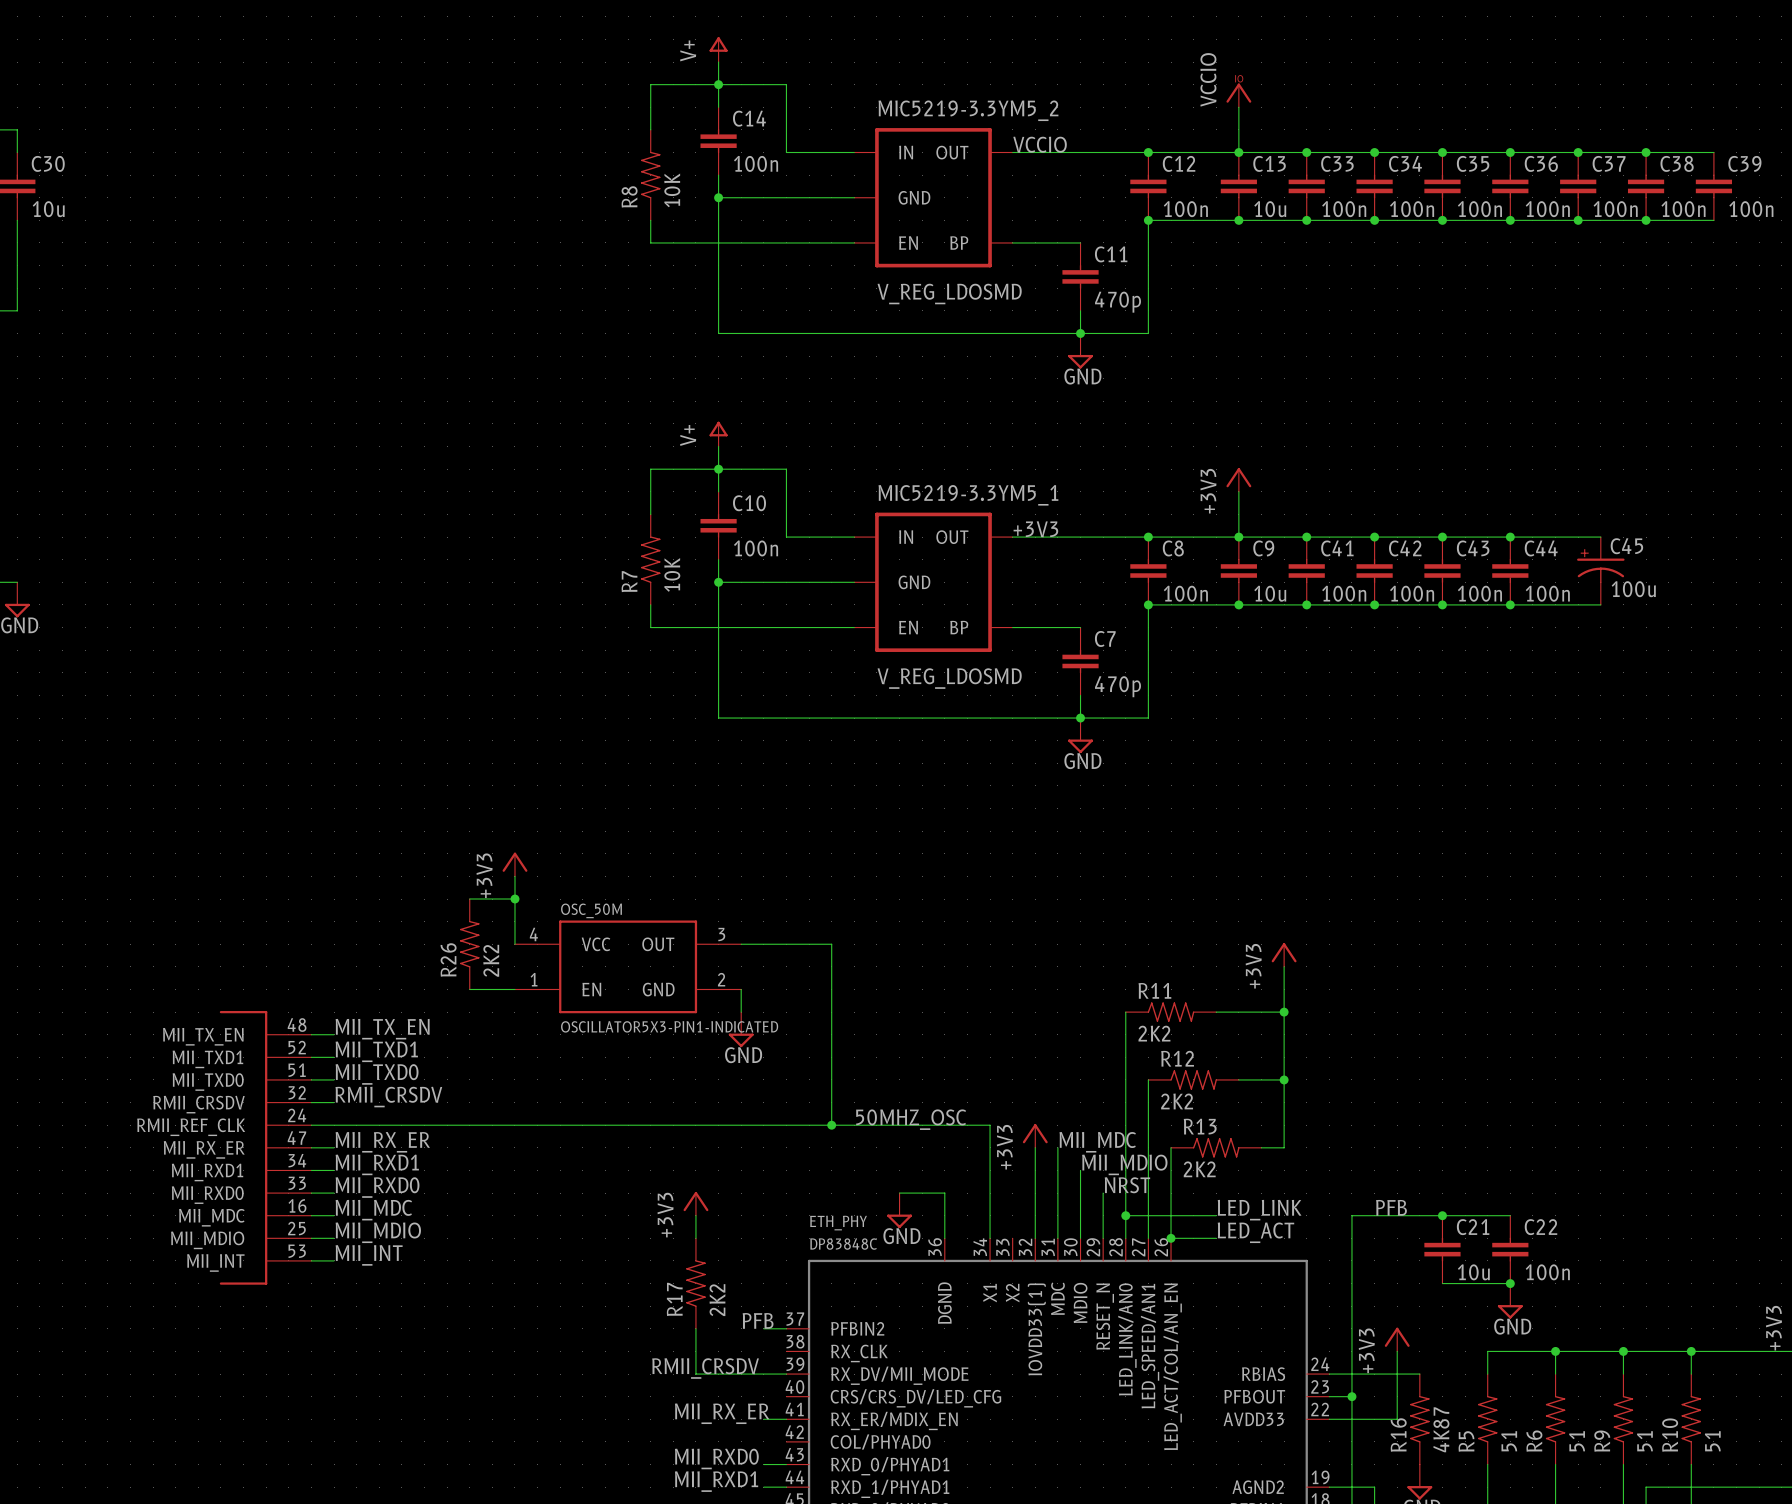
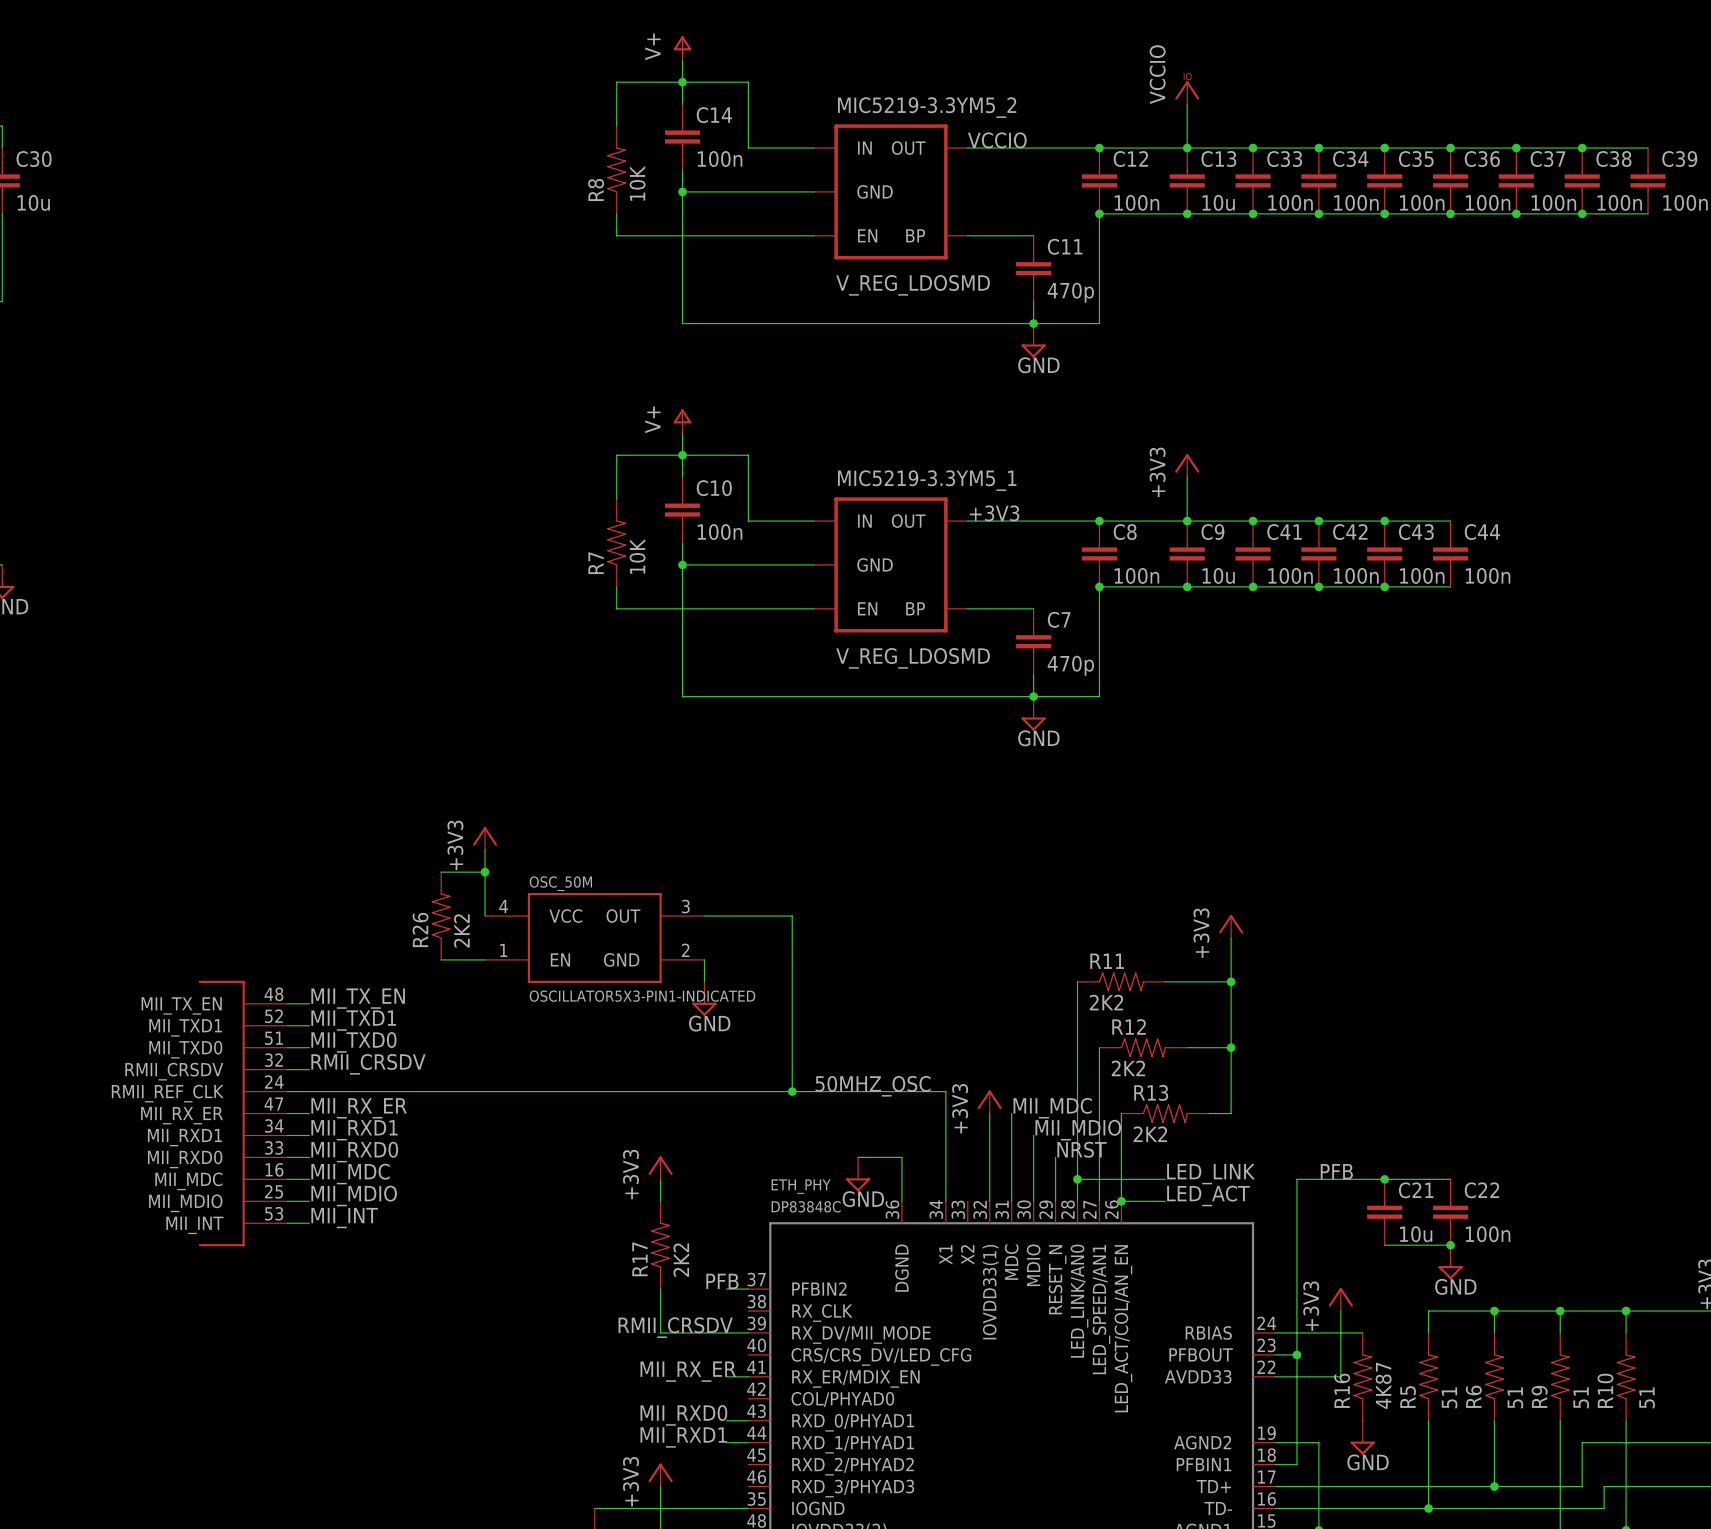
wire: (1510, 537) (1600, 537) -> none
junction: (1510, 537) -> none
C45: 100u (1600, 570) -> none
wire: (1510, 604) (1600, 604) -> none
junction: (1510, 604) -> none

